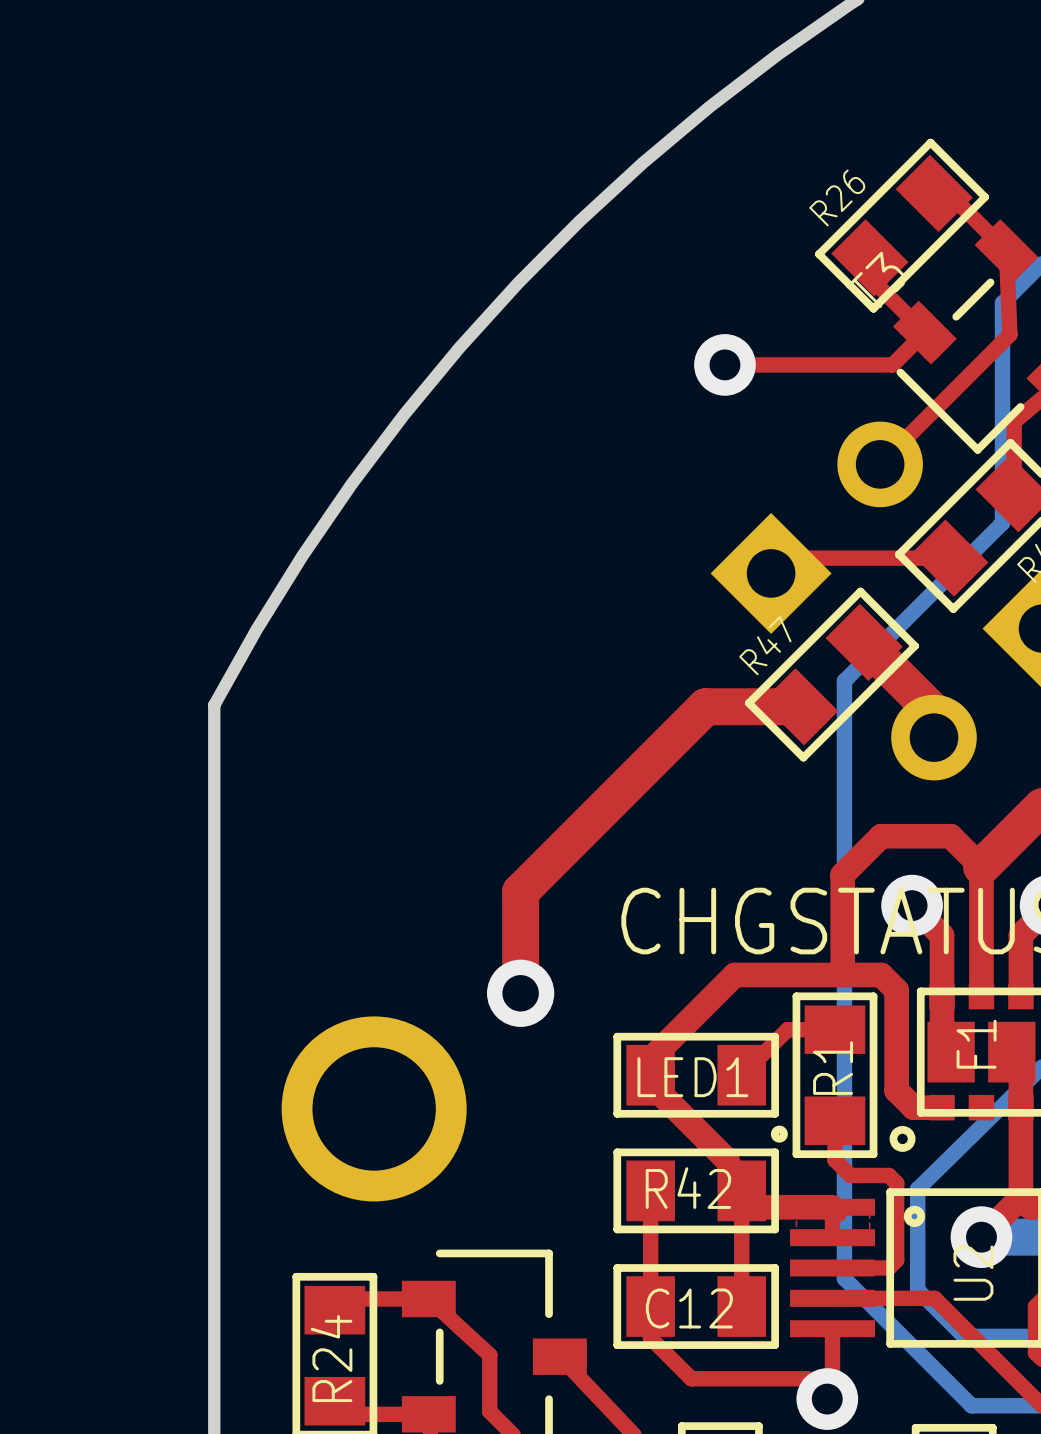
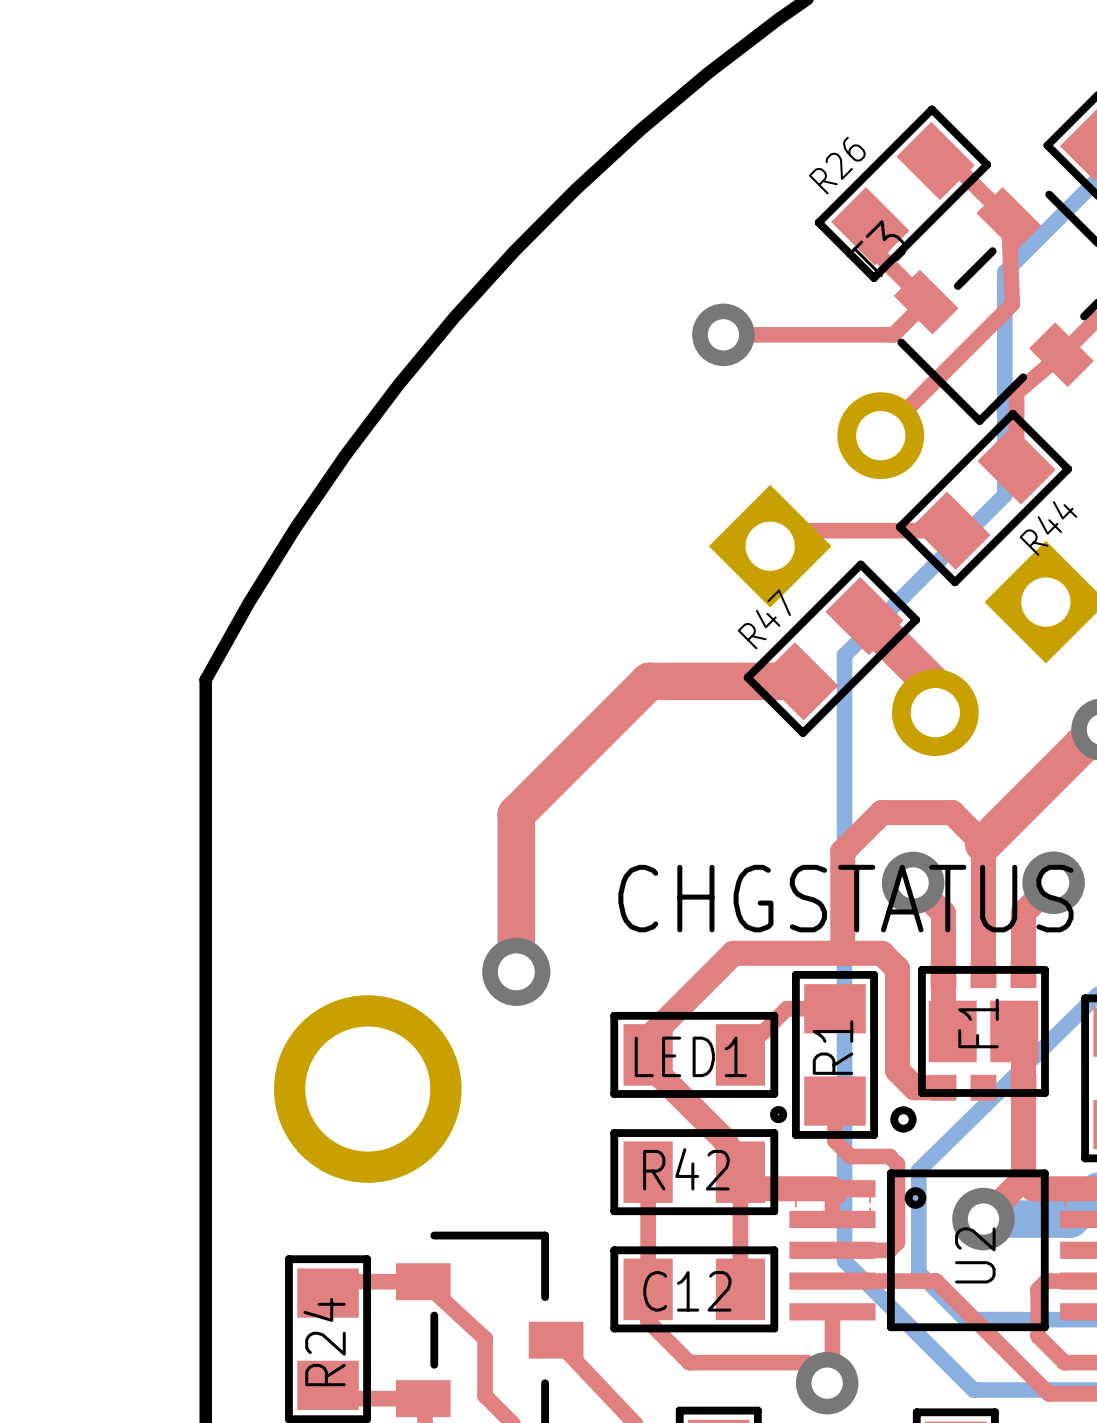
top track: (705, 706) (520, 891) -> (703, 681) (649, 681) (516, 814) (516, 868)

